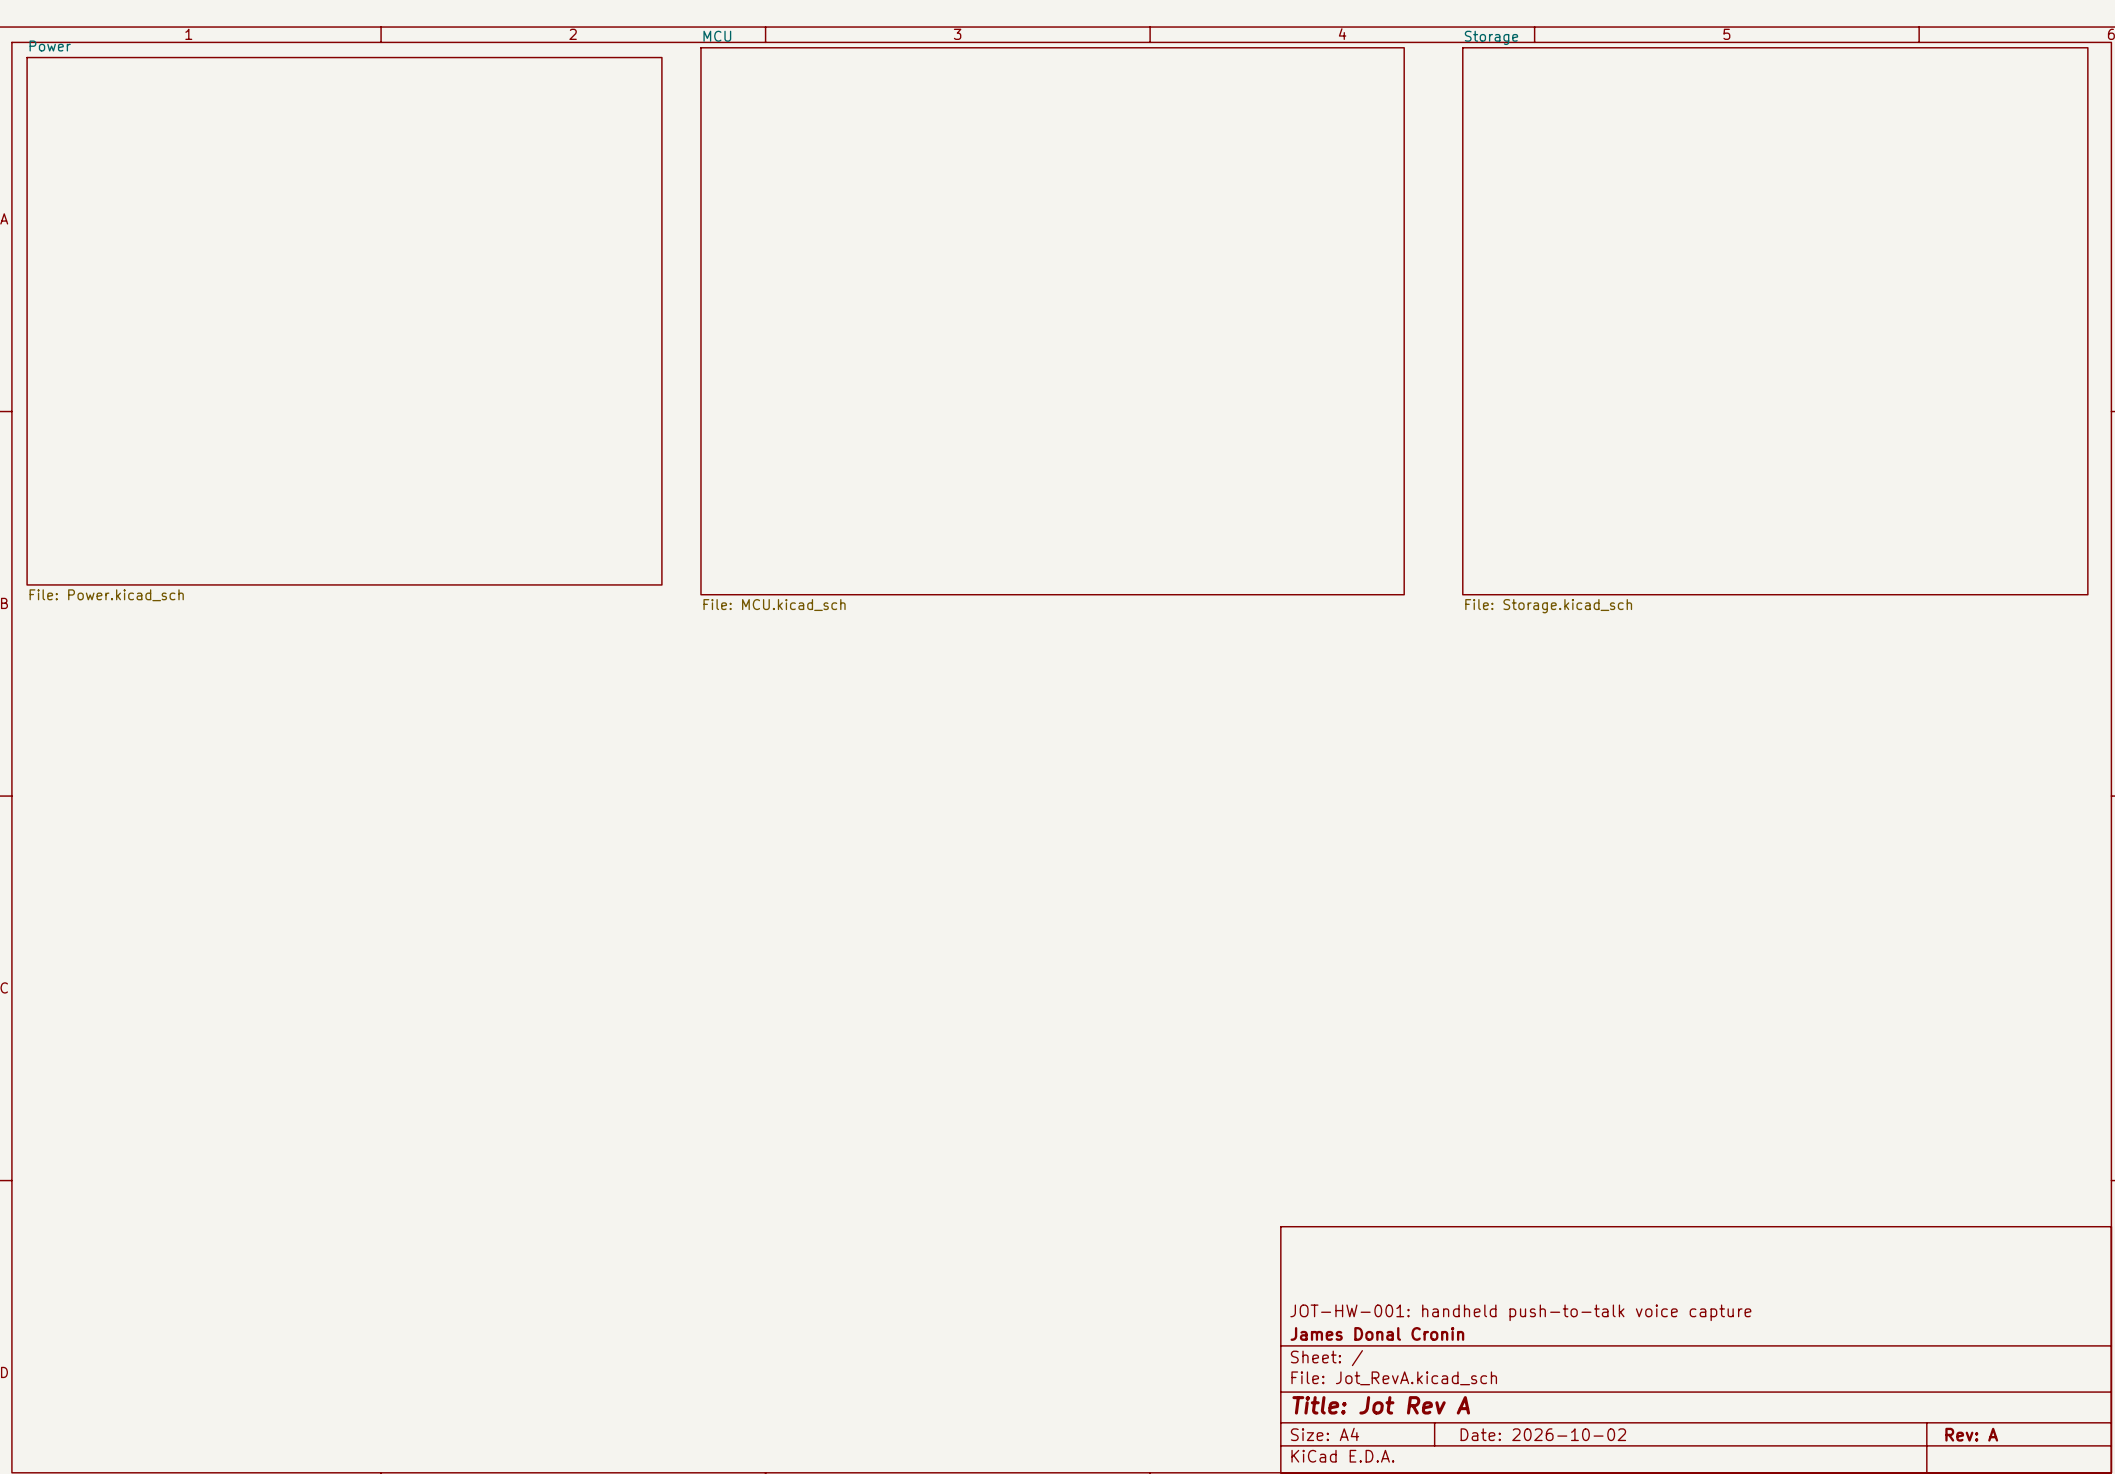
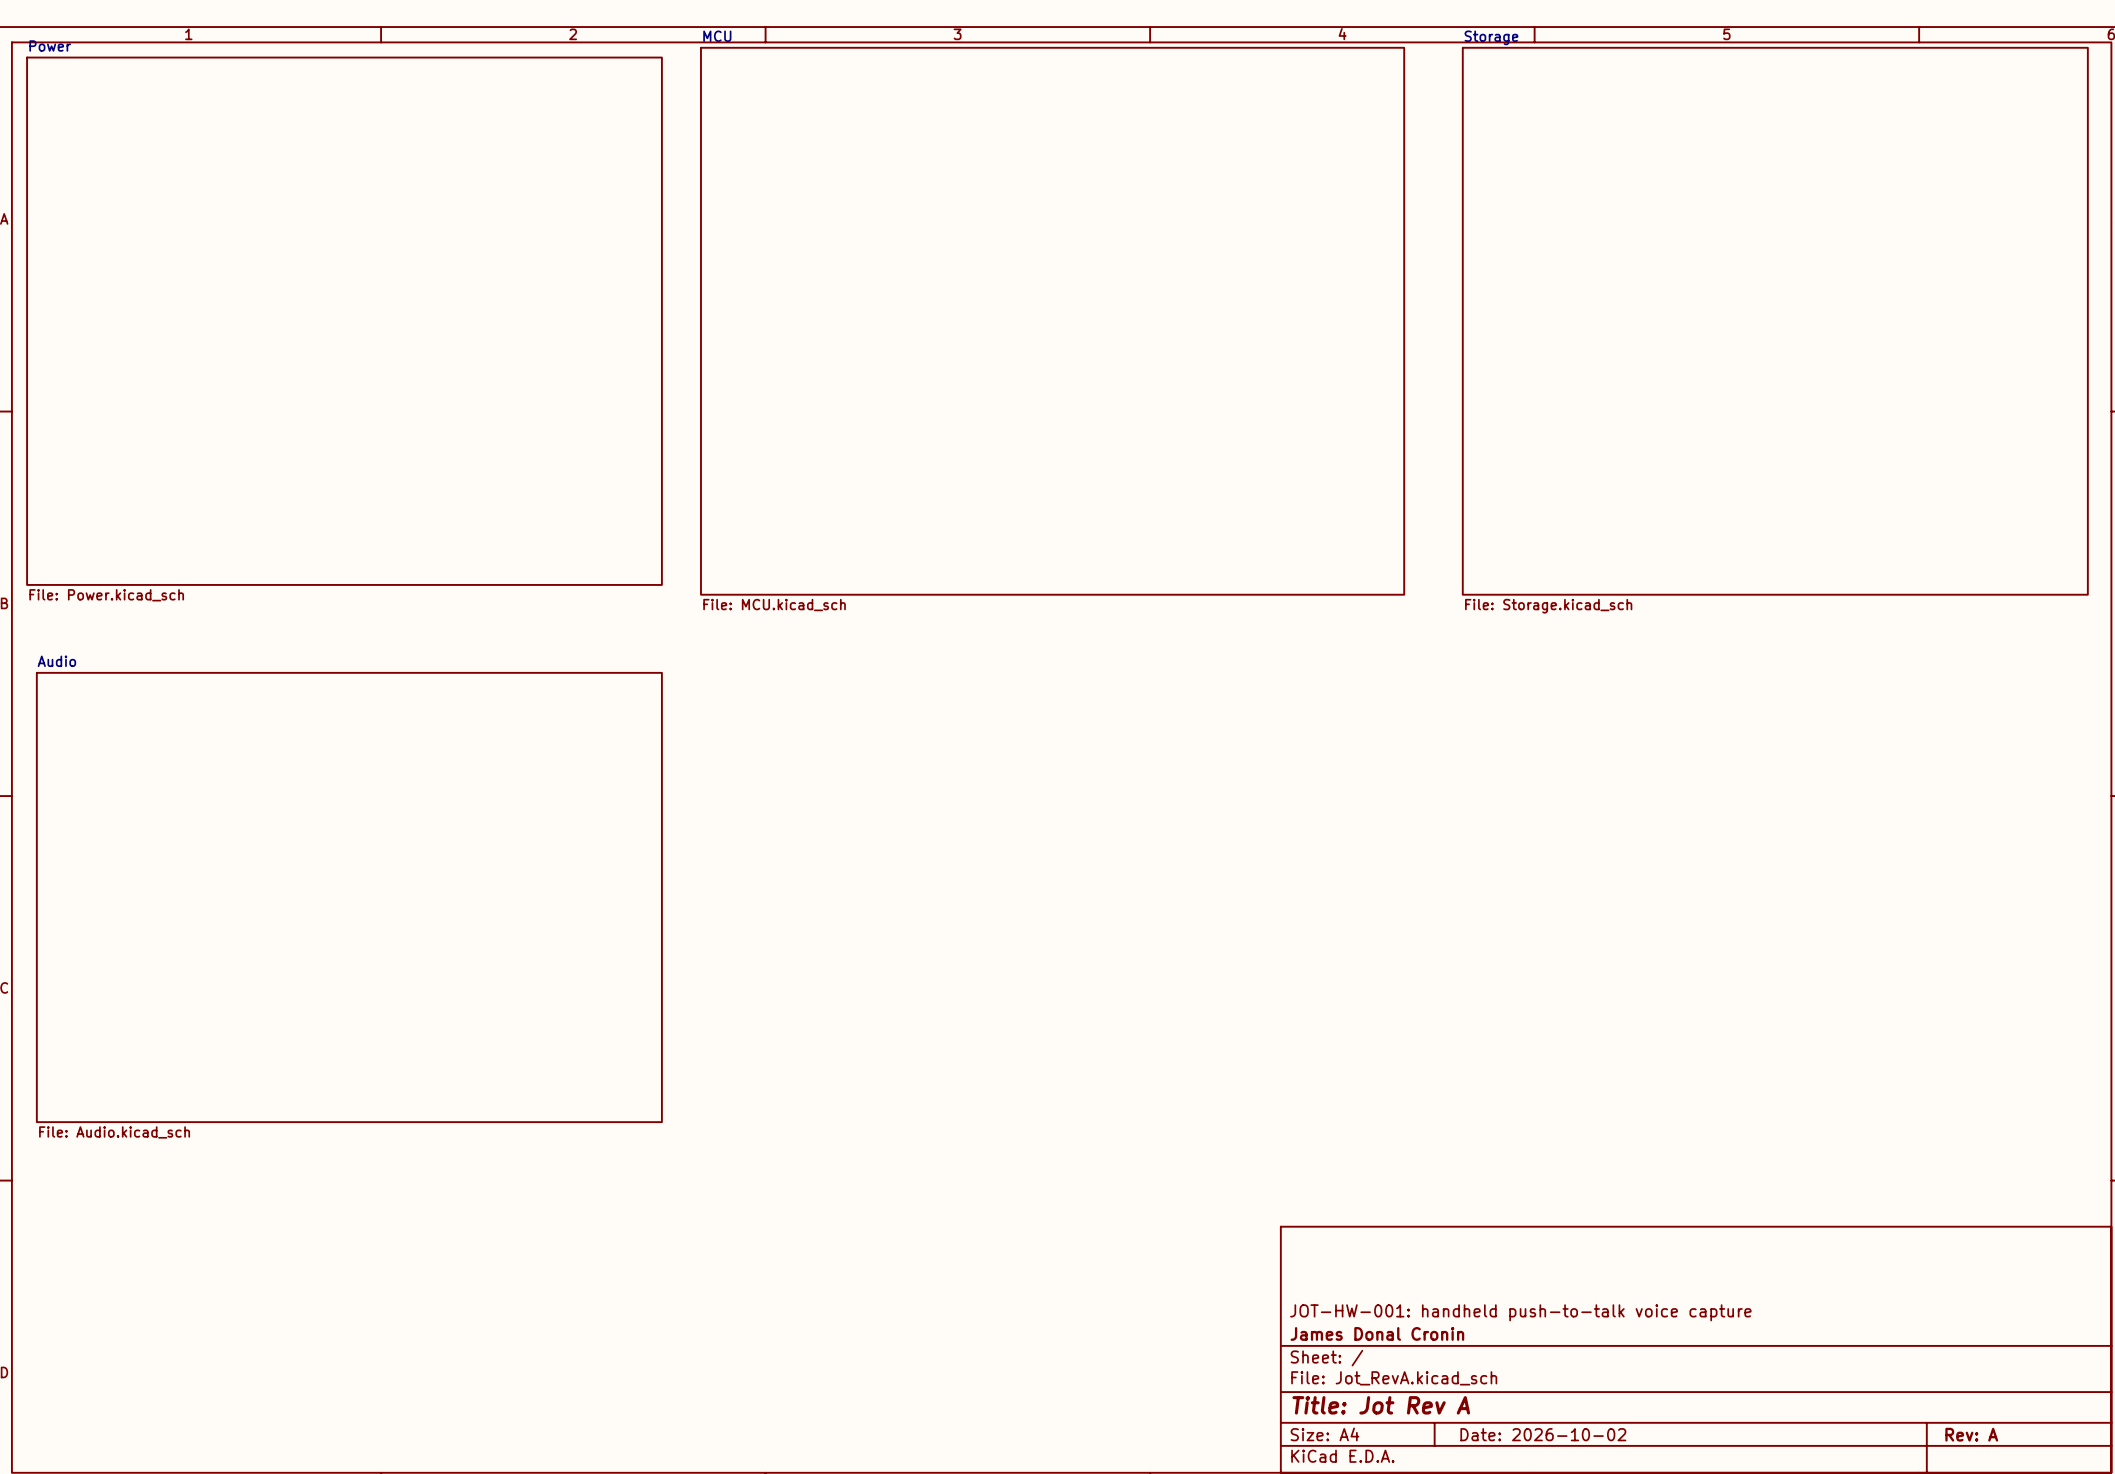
sheet Audio: none -> File: Audio.kicad_sch (349, 897)

